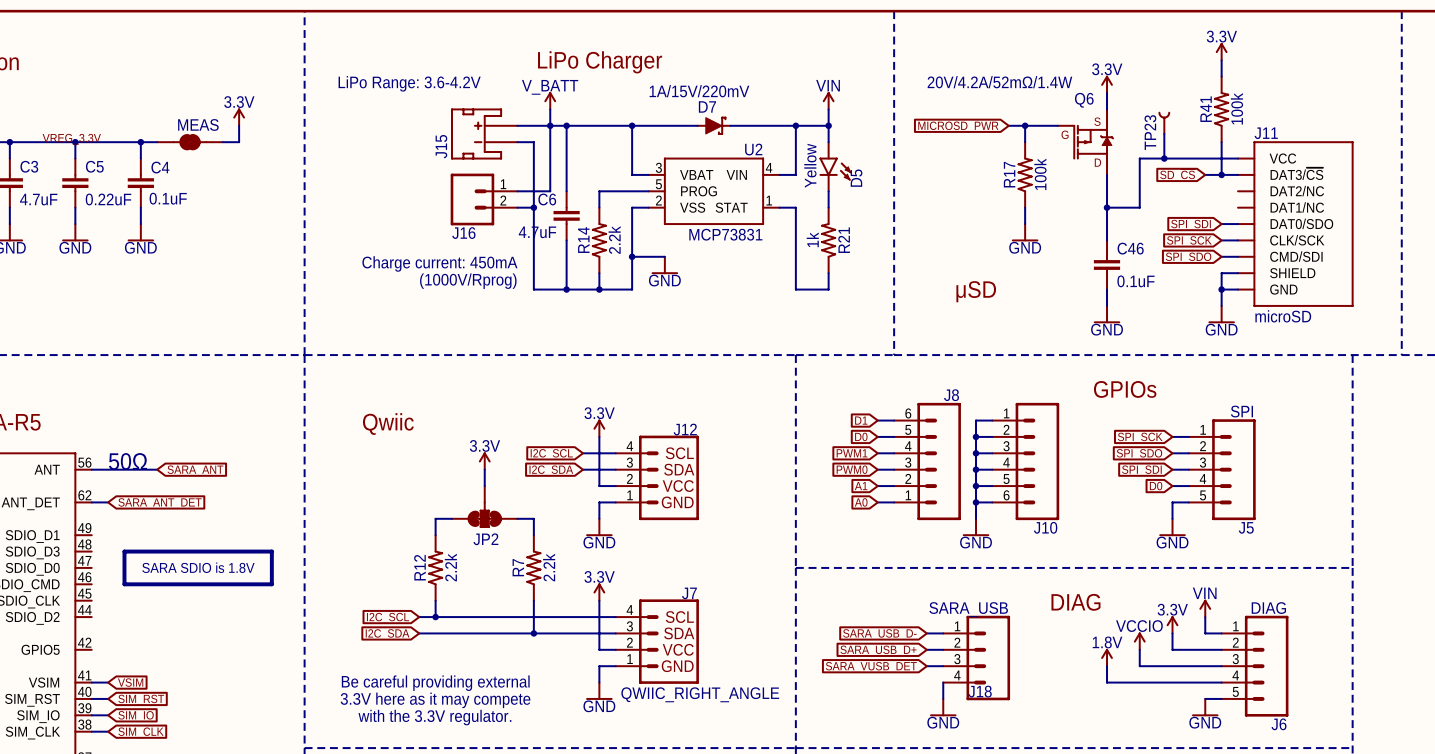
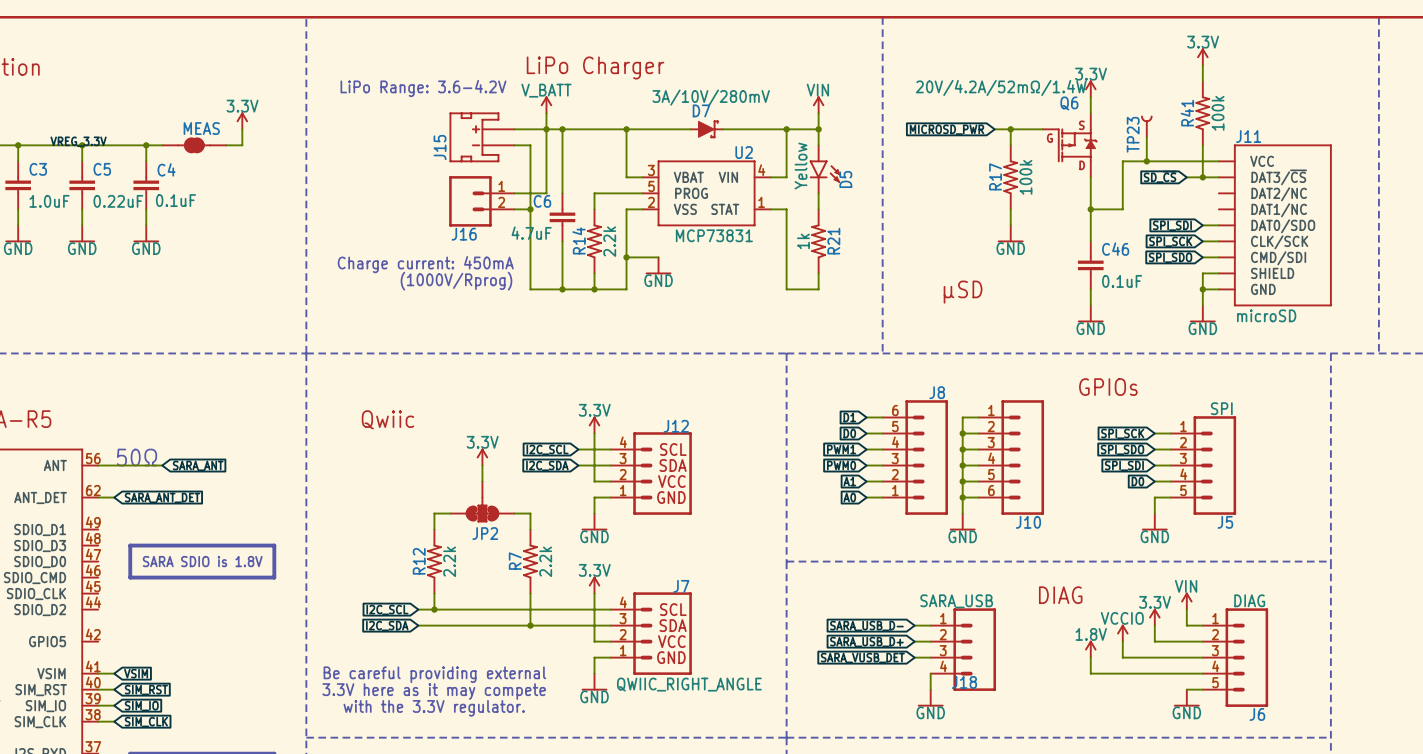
D7 value: 1A/15V/220mV (699, 91) -> 3A/10V/280mV (711, 97)
C3 value: 4.7uF (38, 199) -> 1.0uF (49, 201)

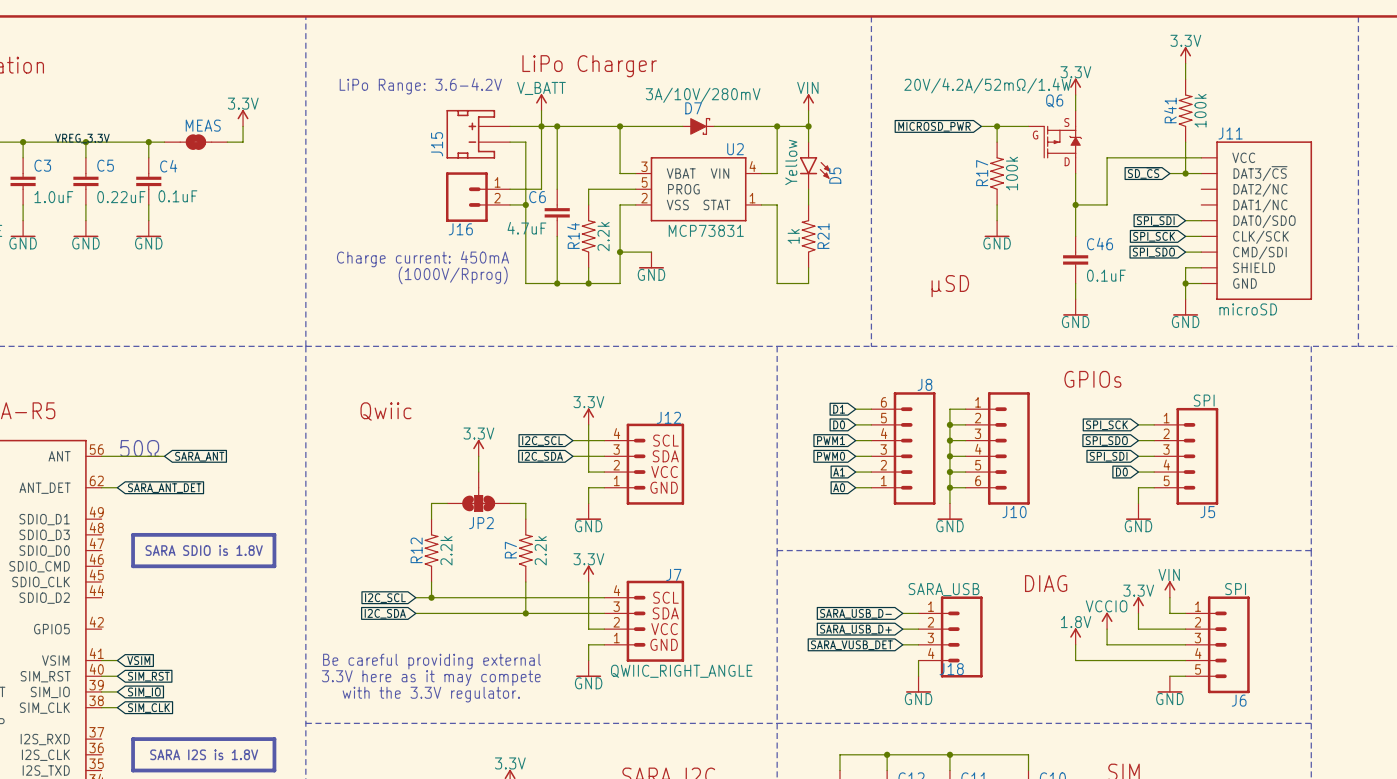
TP23: (1146, 126) -> none
wire: (1146, 137) (1146, 161) -> none
junction: (1146, 161) -> none
J6 value: DIAG (1249, 600) -> SPI (1235, 589)

